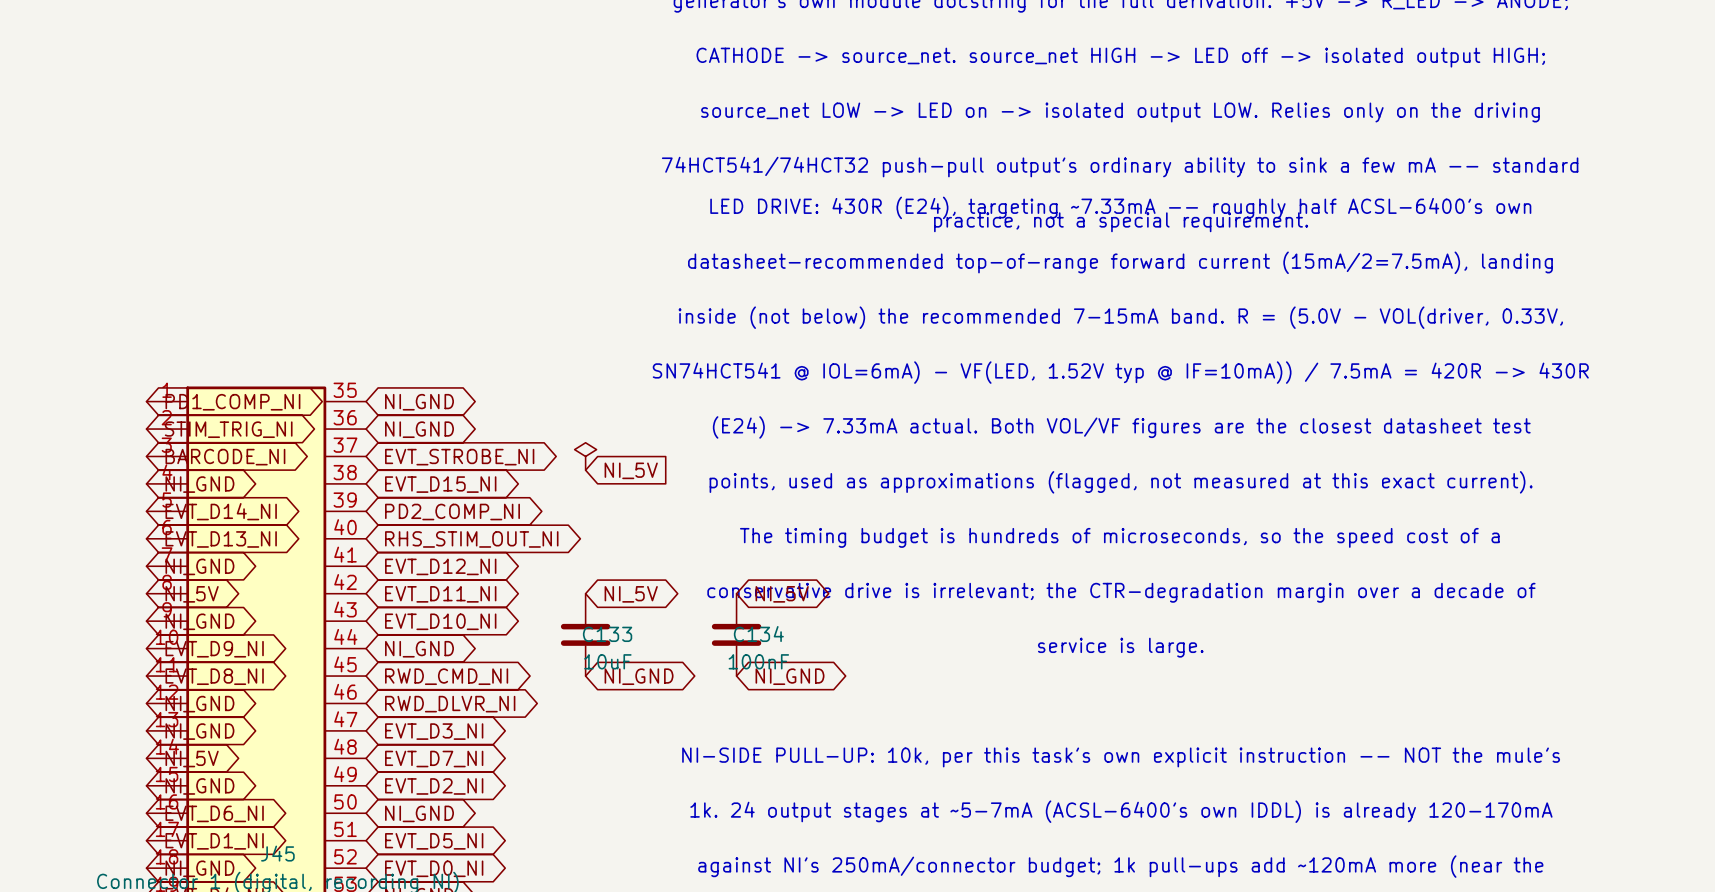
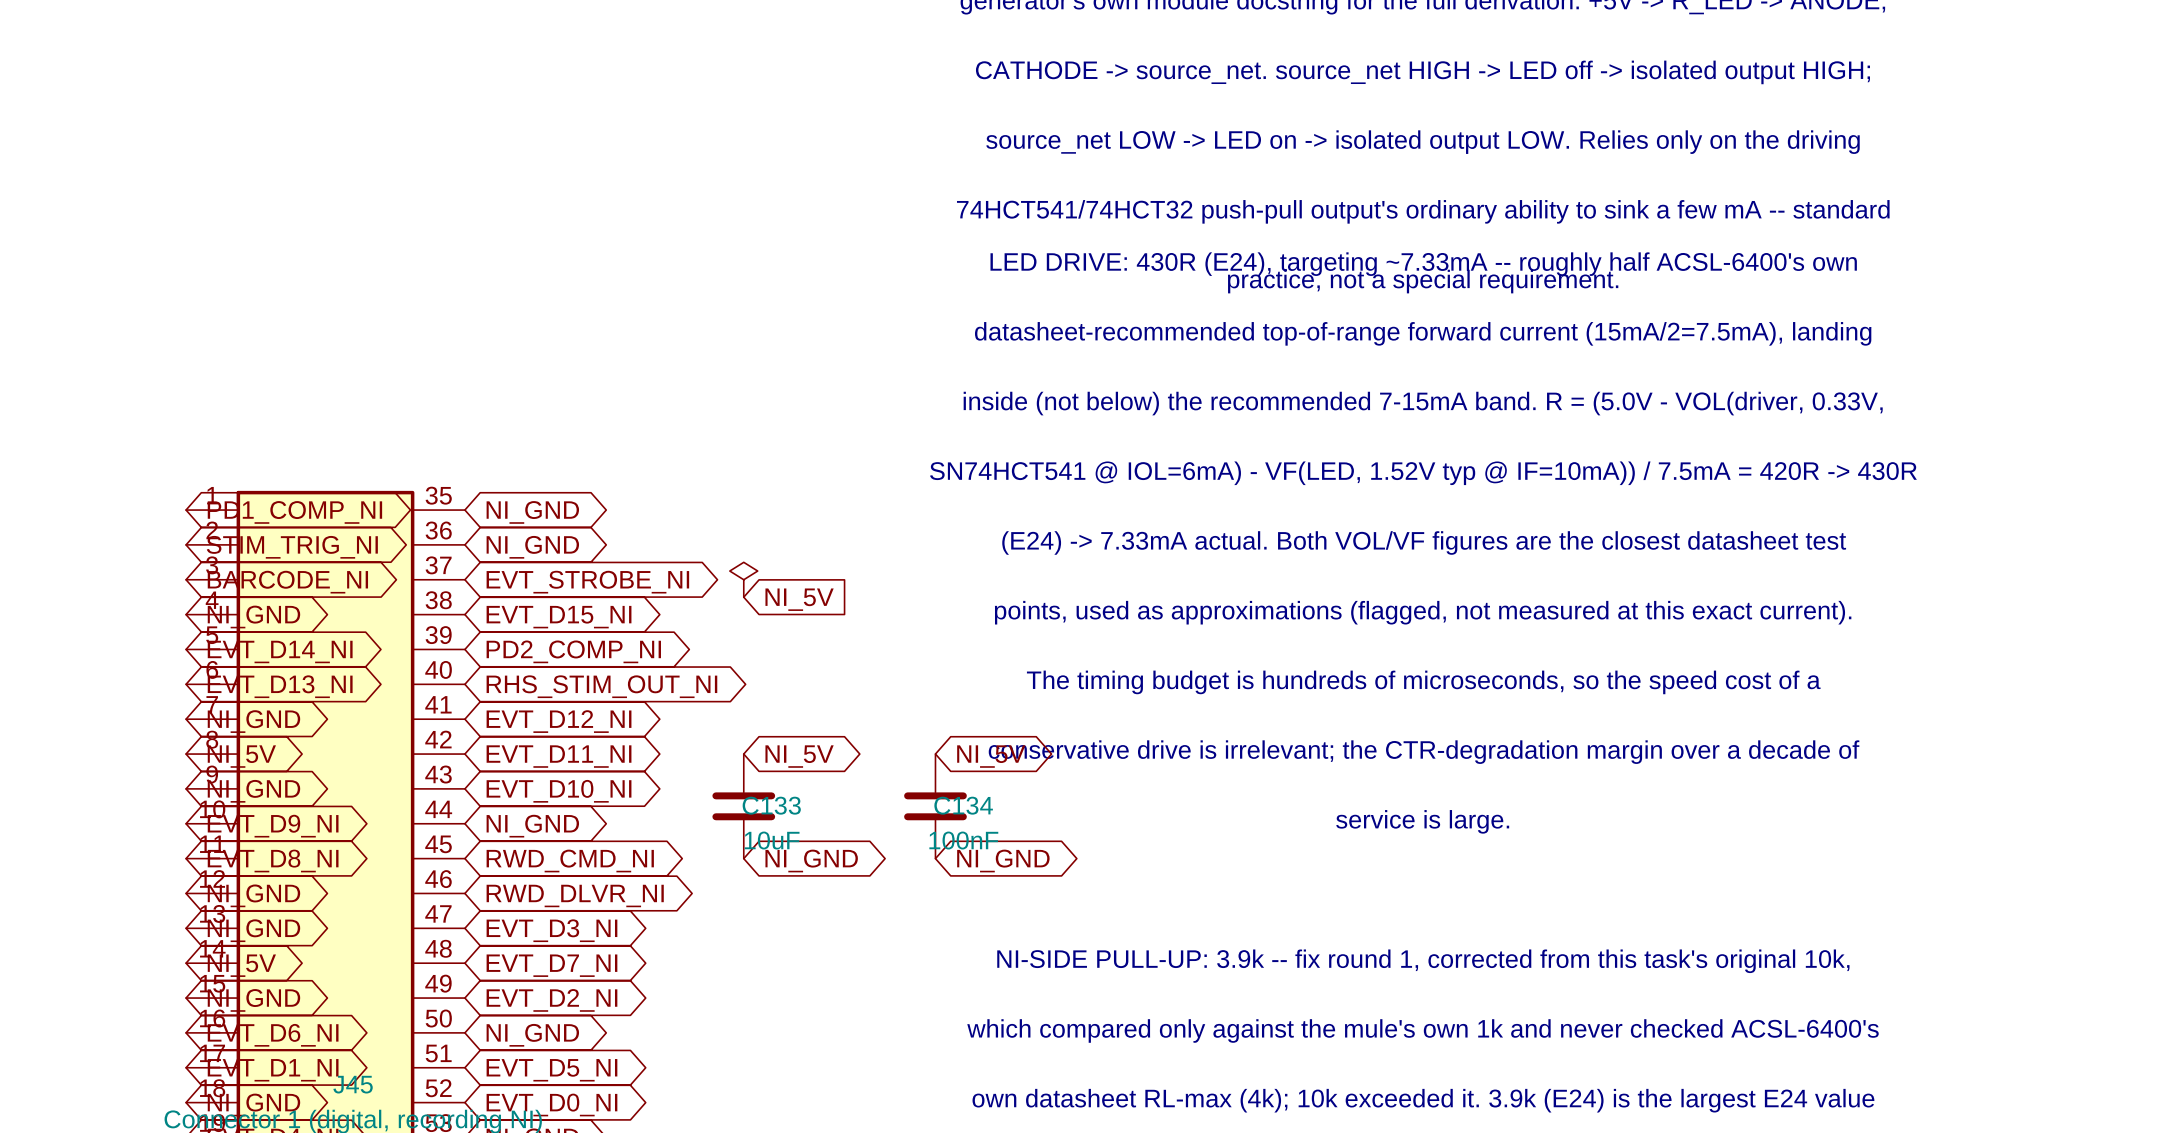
text: NI-SIDE PULL-UP: 10k, per this task's own explicit instruction -- NOT the mule's (1121, 757) -> NI-SIDE PULL-UP: 3.9k -- fix round 1, corrected from this task's original 10k, (1423, 961)
text: 1k. 24 output stages at ~5-7mA (ACSL-6400's own IDDL) is already 120-170mA (1121, 811) -> which compared only against the mule's own 1k and never checked ACSL-6400's (1423, 1030)
text: against NI's 250mA/connector budget; 1k pull-ups add ~120mA more (near the (1120, 866) -> own datasheet RL-max (4k); 10k exceeded it. 3.9k (E24) is the largest E24 value (1423, 1100)

